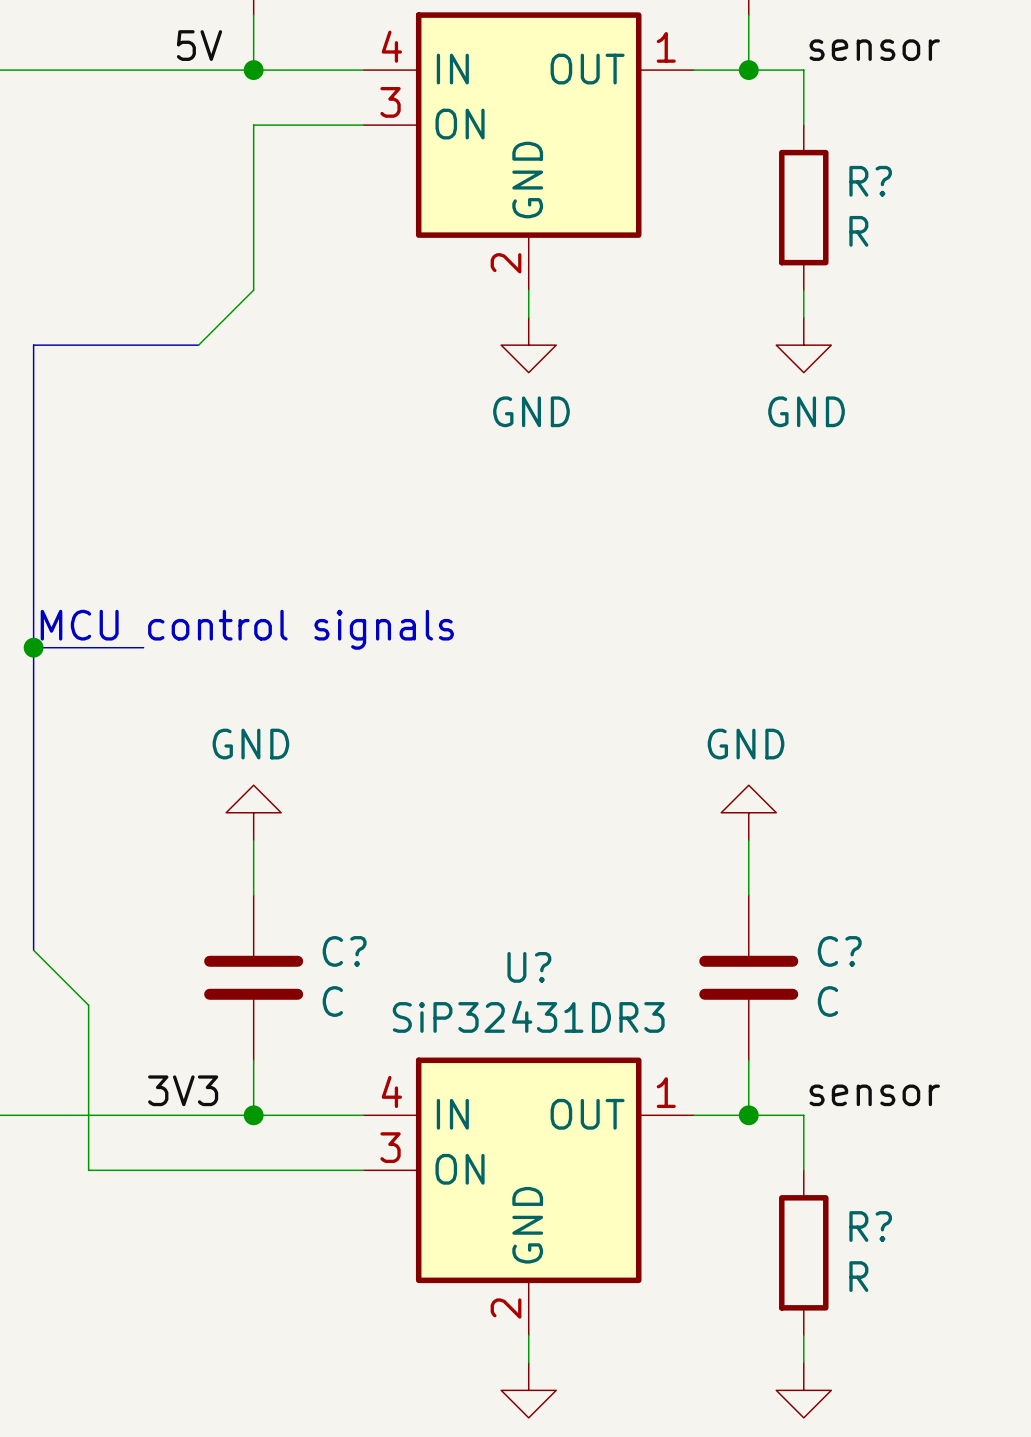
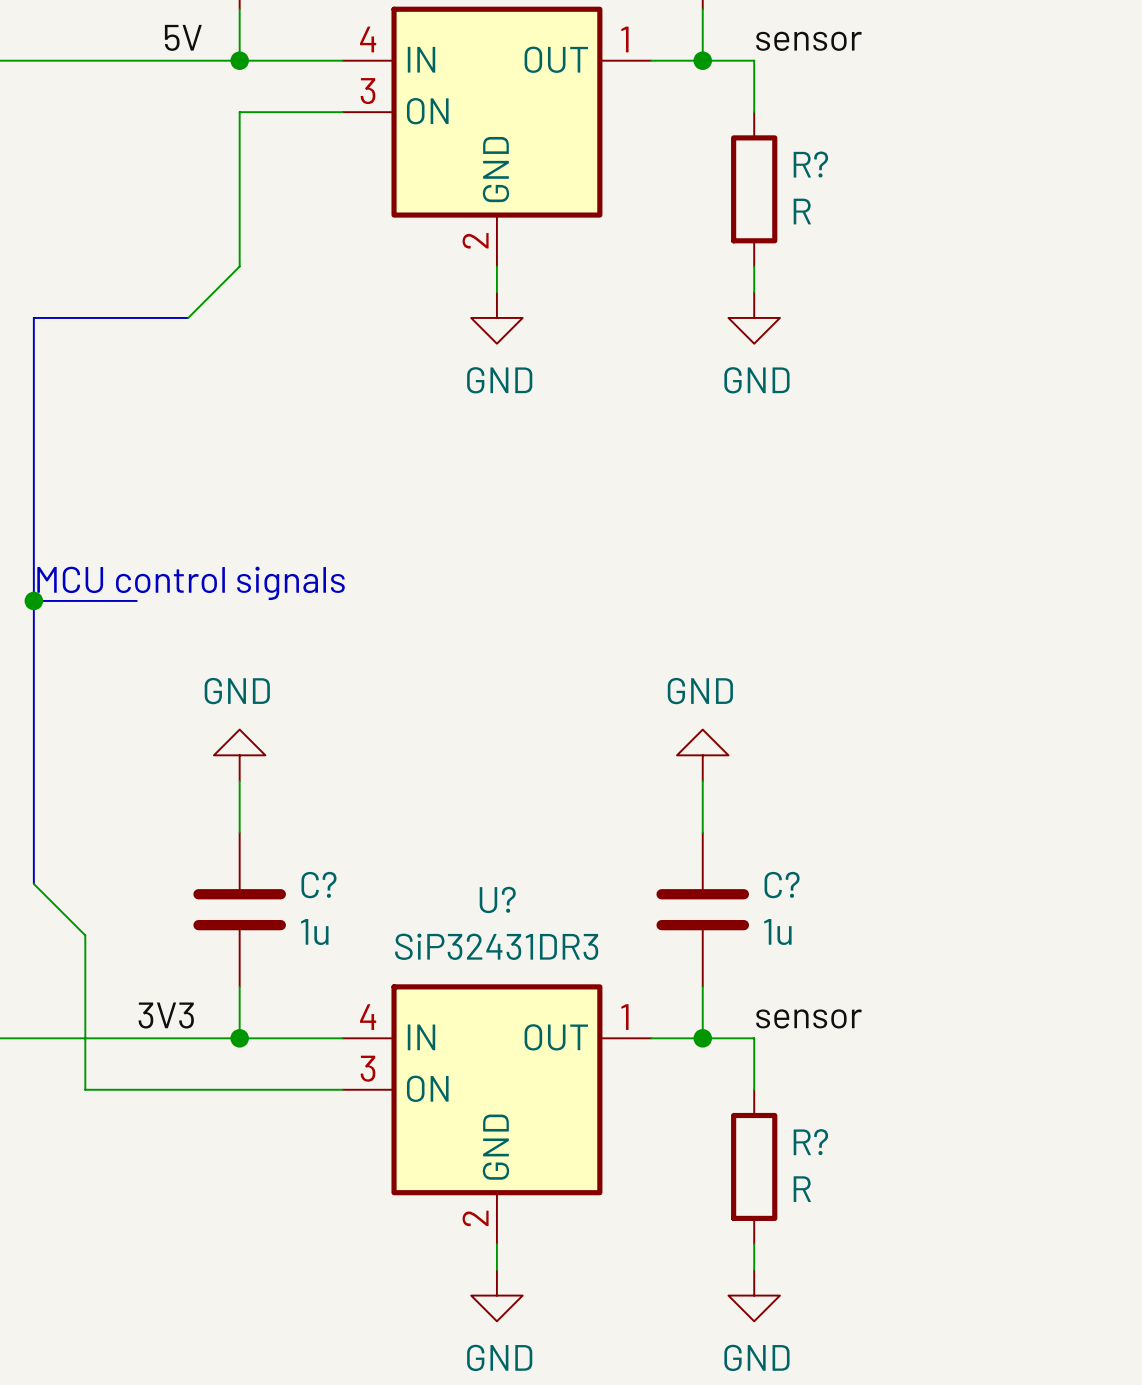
C? value: C (332, 1001) -> 1u (314, 932)
C? value: C (827, 1001) -> 1u (777, 932)

